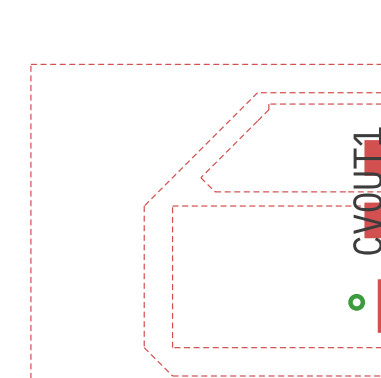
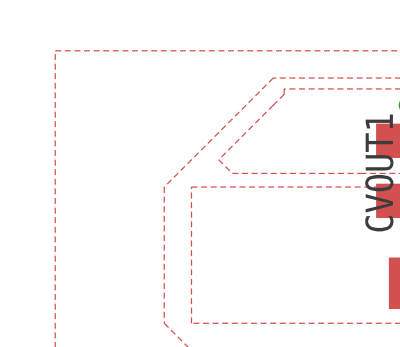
via: (356, 302) -> none

